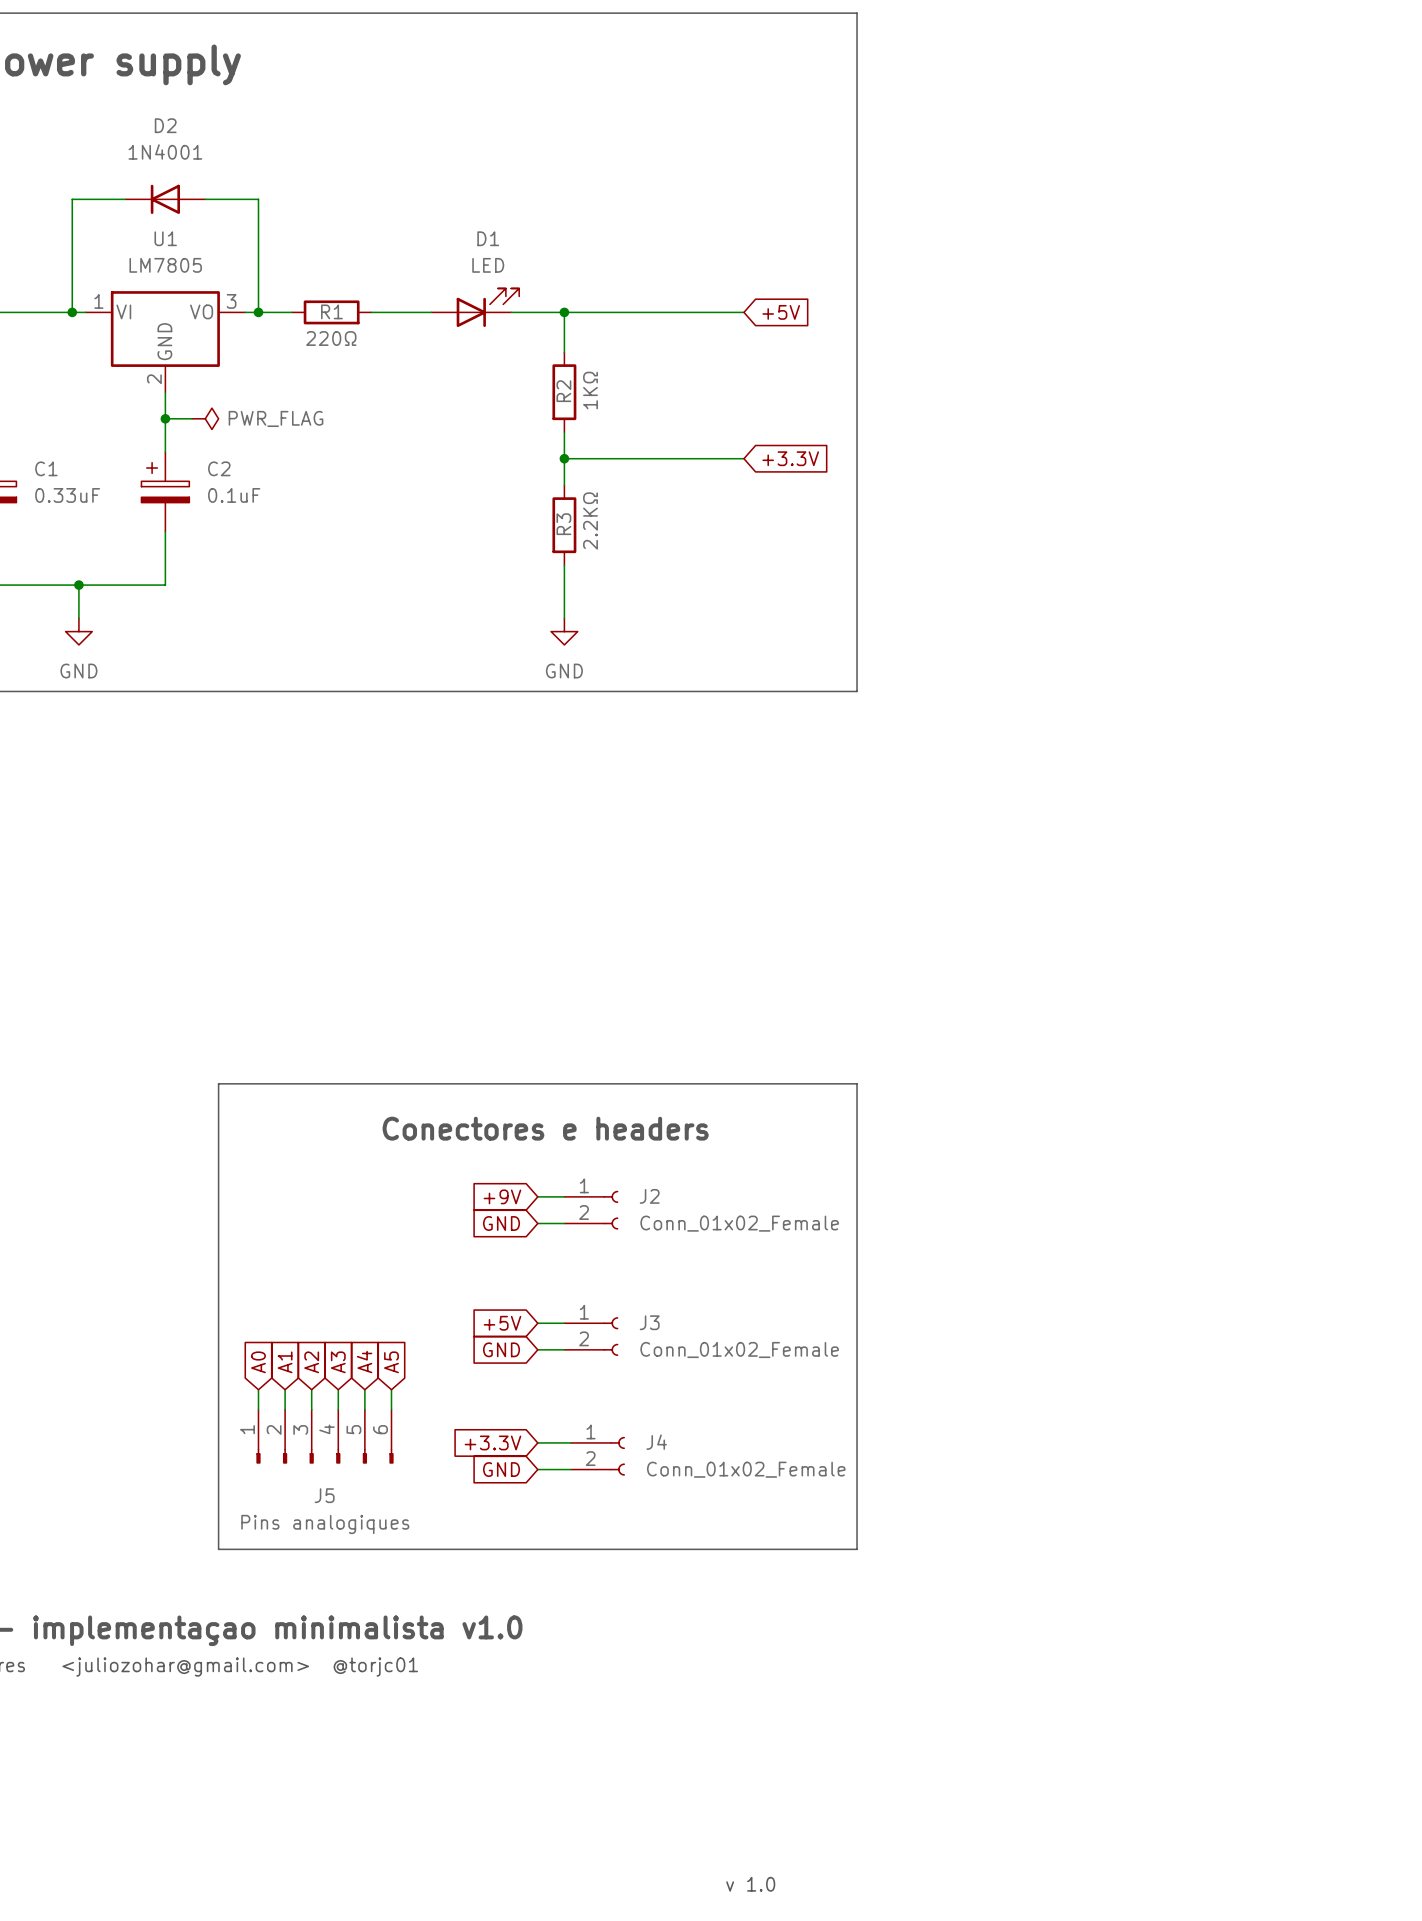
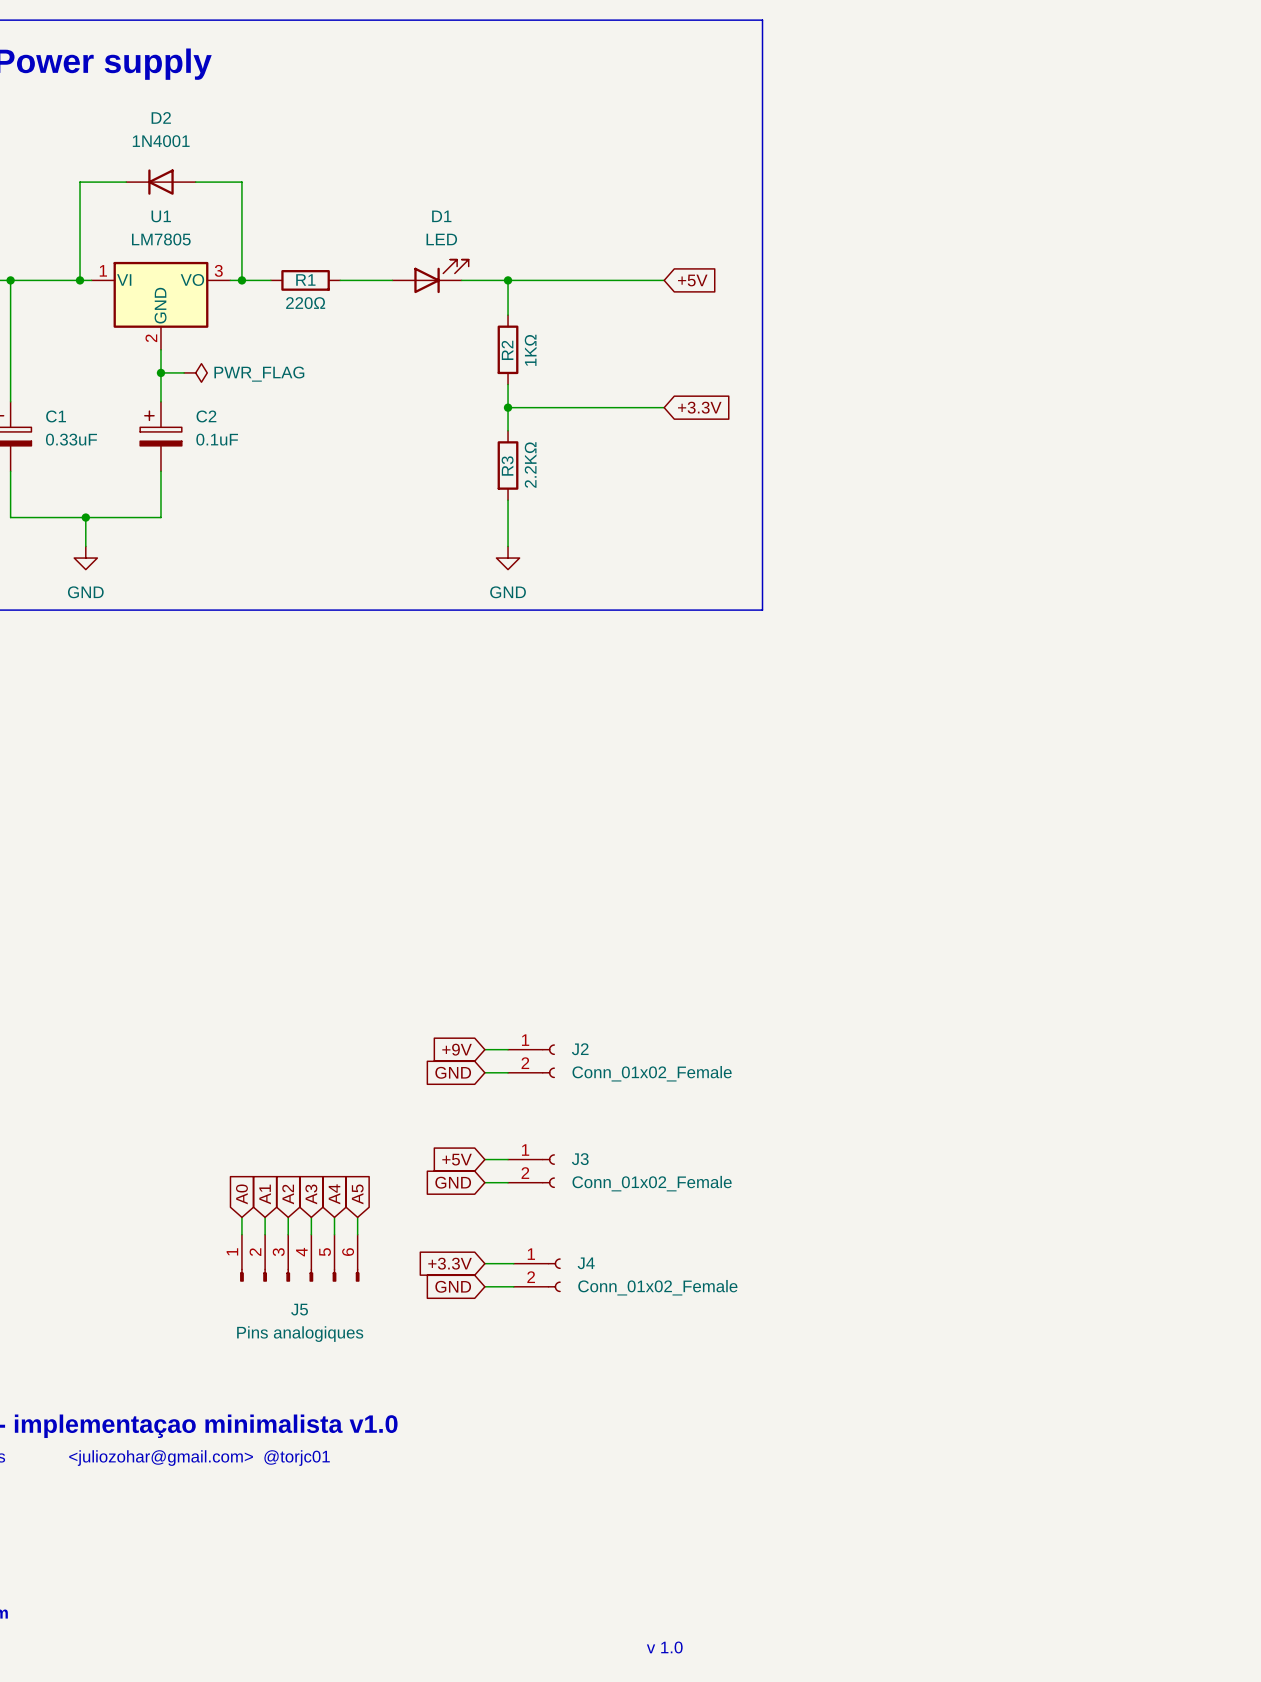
line: (218, 1083) (218, 1549) (857, 1549) (857, 1083) (218, 1083) -> none
text: Conectores e headers (545, 1128) -> none

